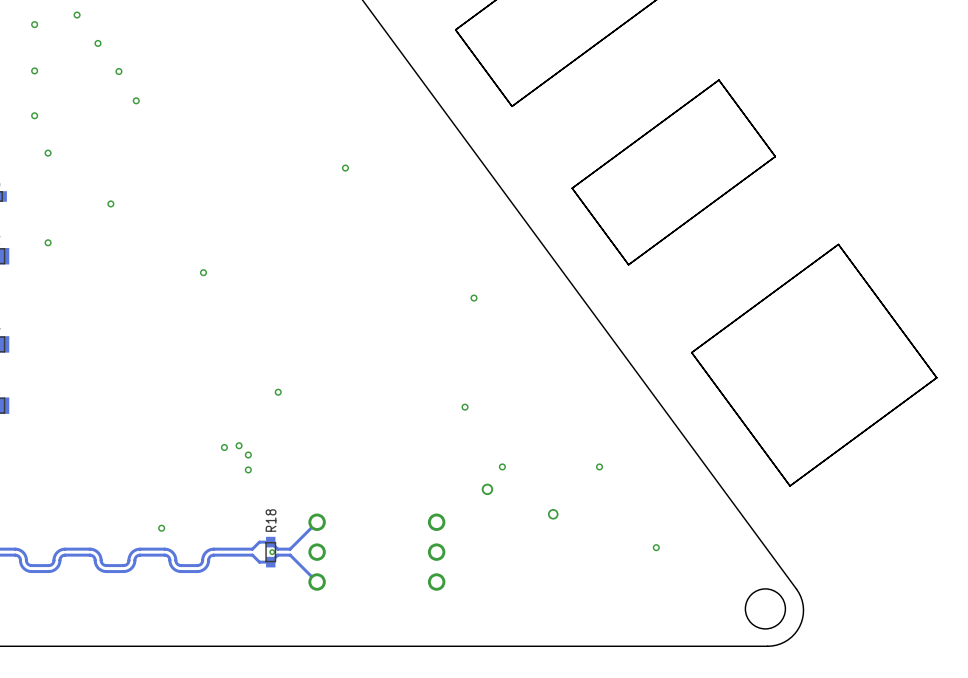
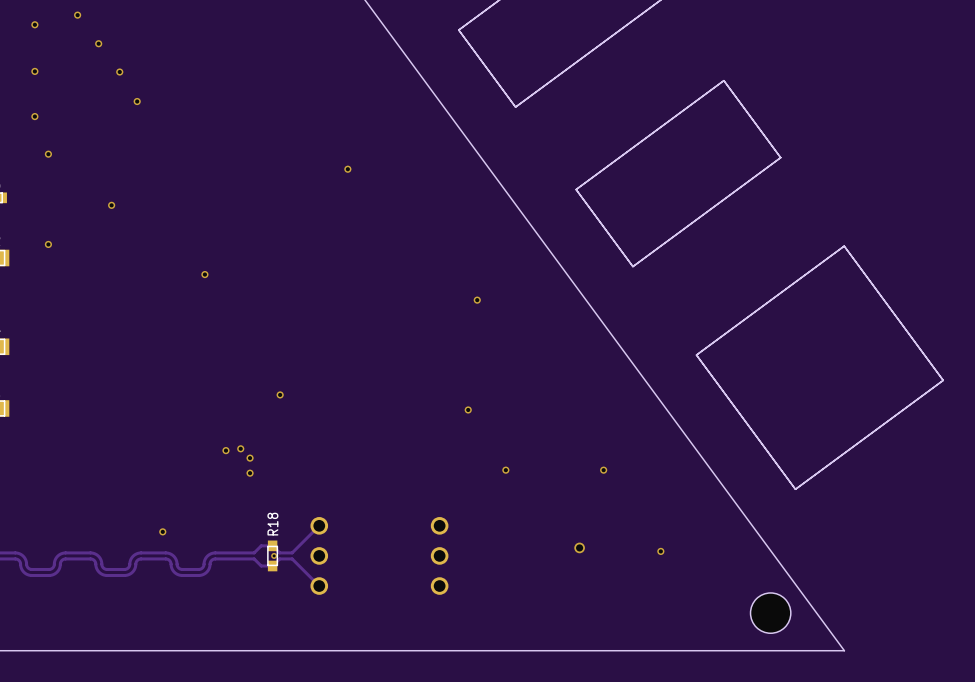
via: (487, 489) -> none
via position: (553, 514) -> (579, 547)
board edge: (796, 589) (803, 605) (803, 614) (799, 626) (791, 637) (784, 642) (767, 646) -> (802, 593) (844, 650) (772, 650)

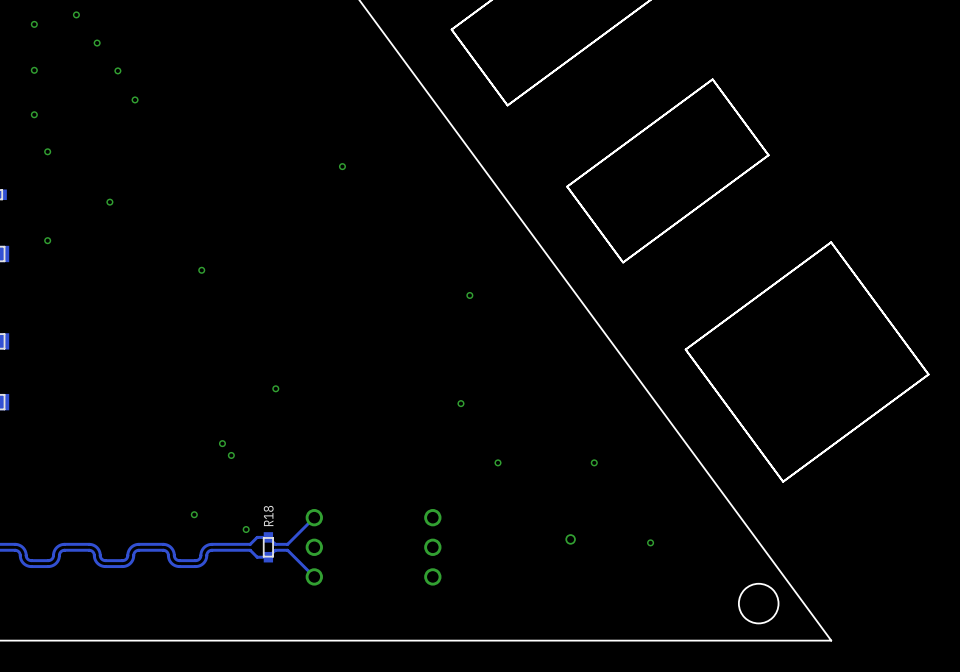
via: (240, 448) -> none
via: (250, 458) -> none
via: none -> (231, 455)
via: (250, 473) -> none
via position: (162, 531) -> (194, 514)
via: none -> (246, 529)
via: (274, 555) -> none

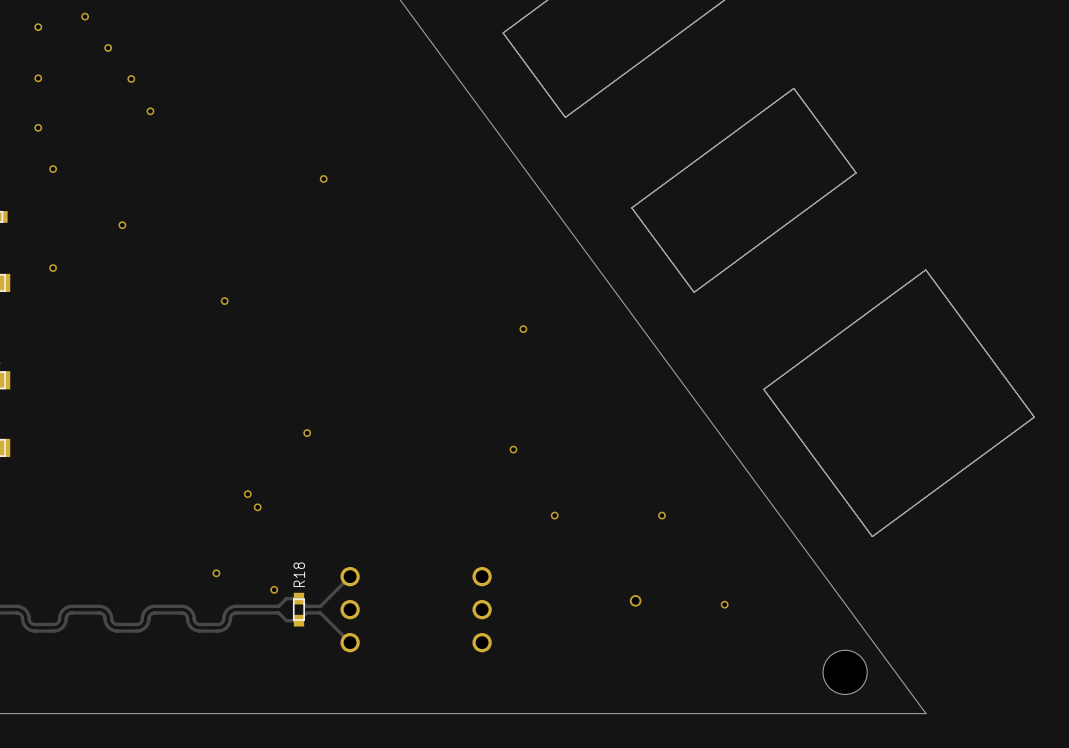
via position: (342, 166) -> (323, 178)

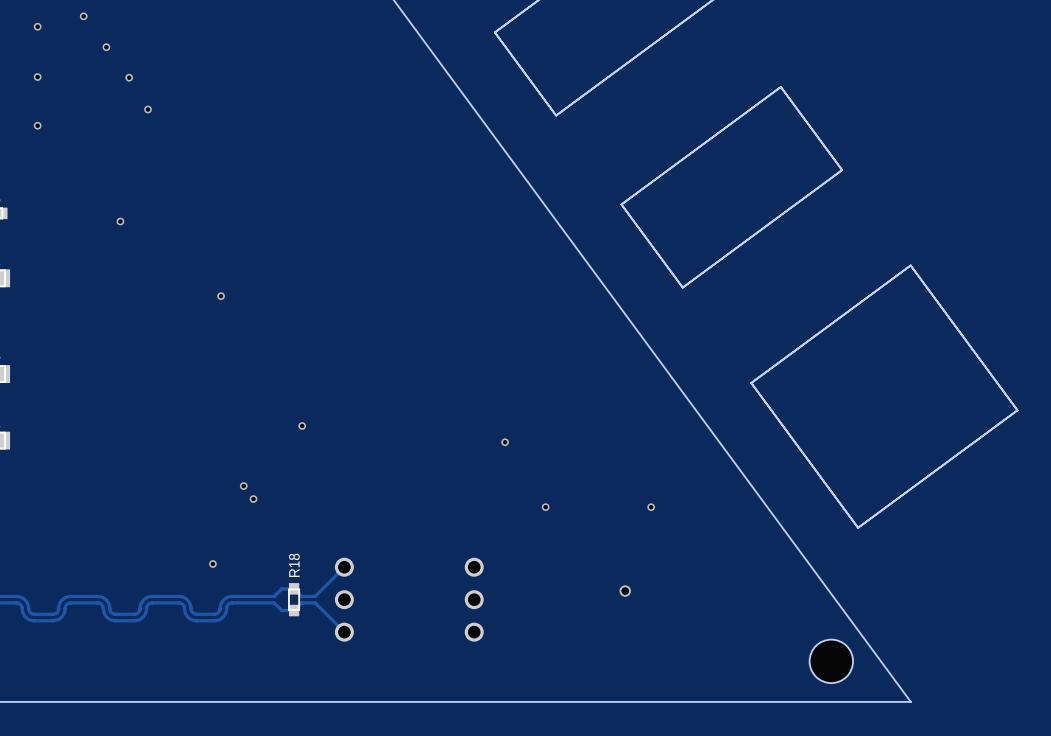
via: (53, 169) -> none
via: (323, 178) -> none
via: (53, 268) -> none
via: (523, 329) -> none
via: (274, 589) -> none
via: (724, 604) -> none

